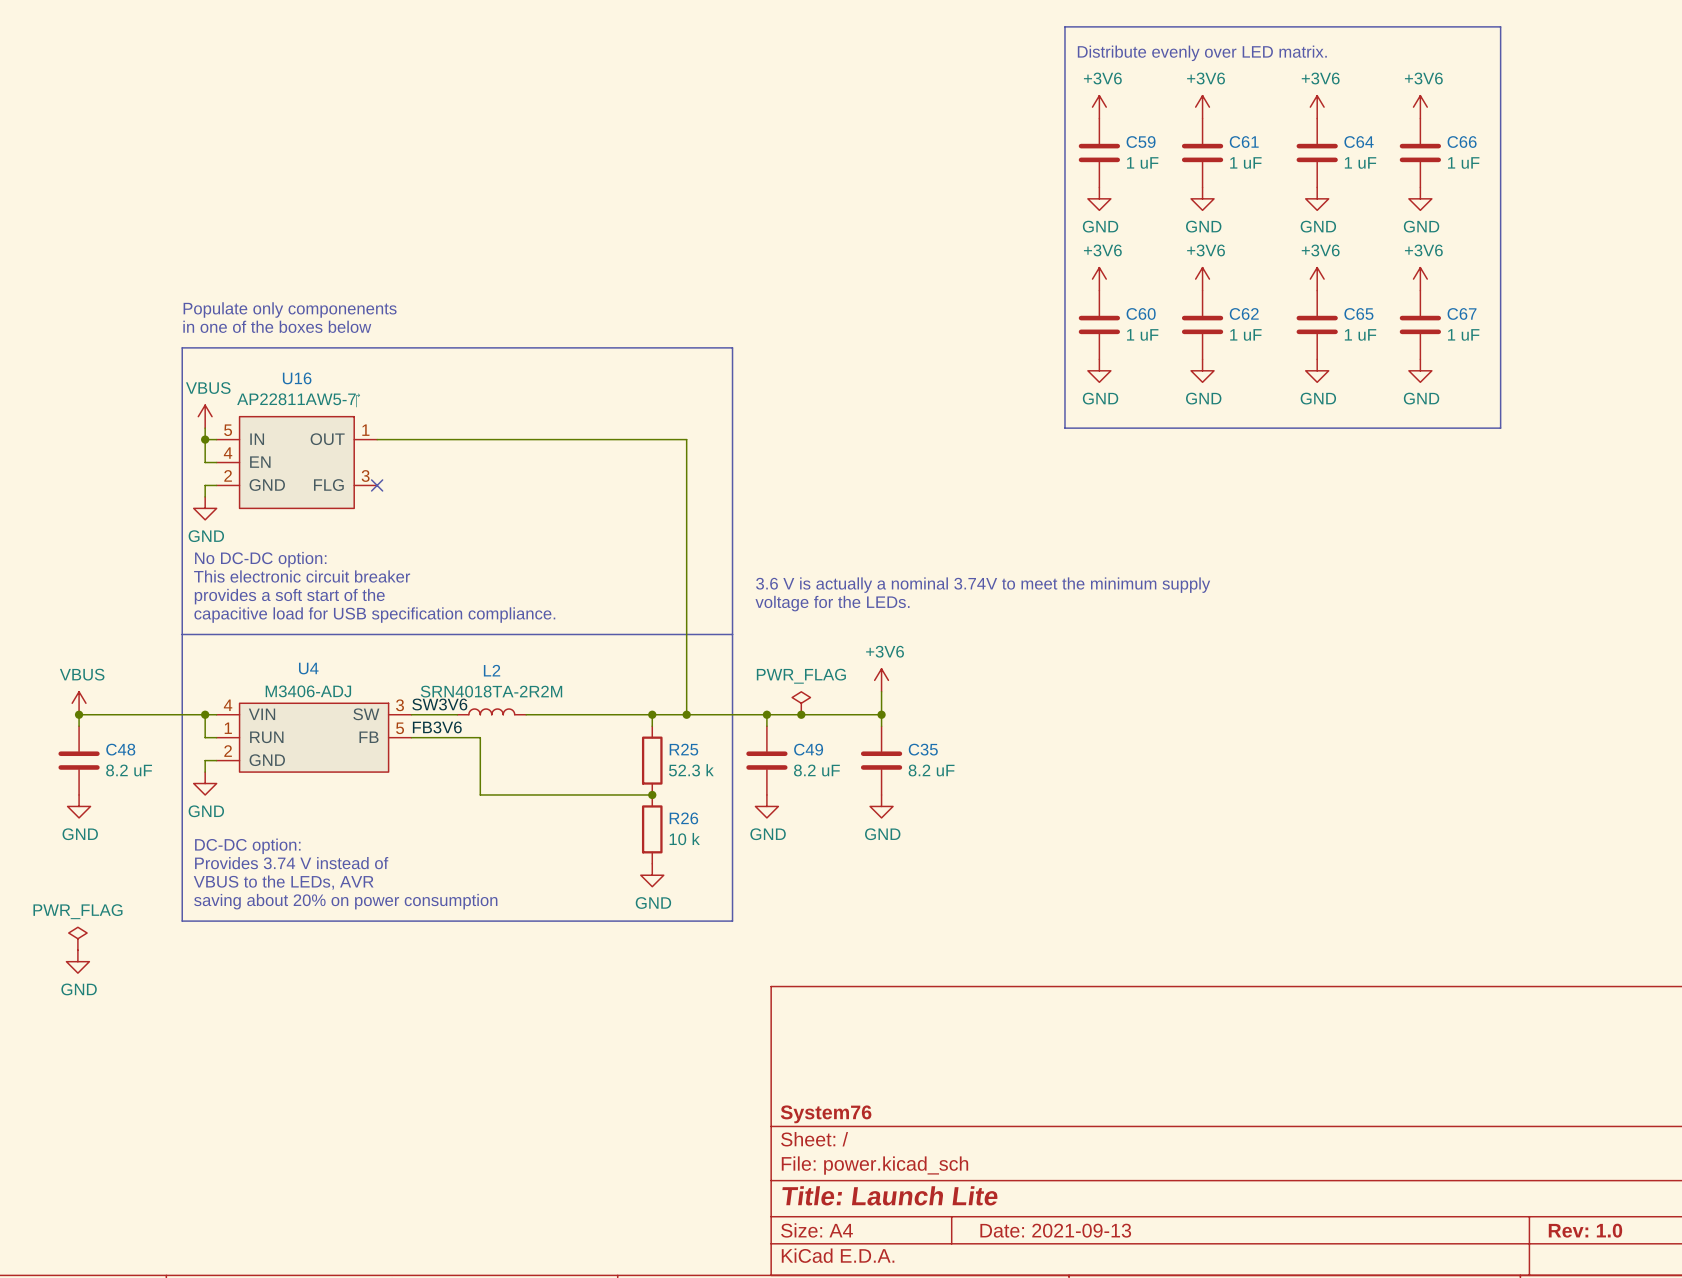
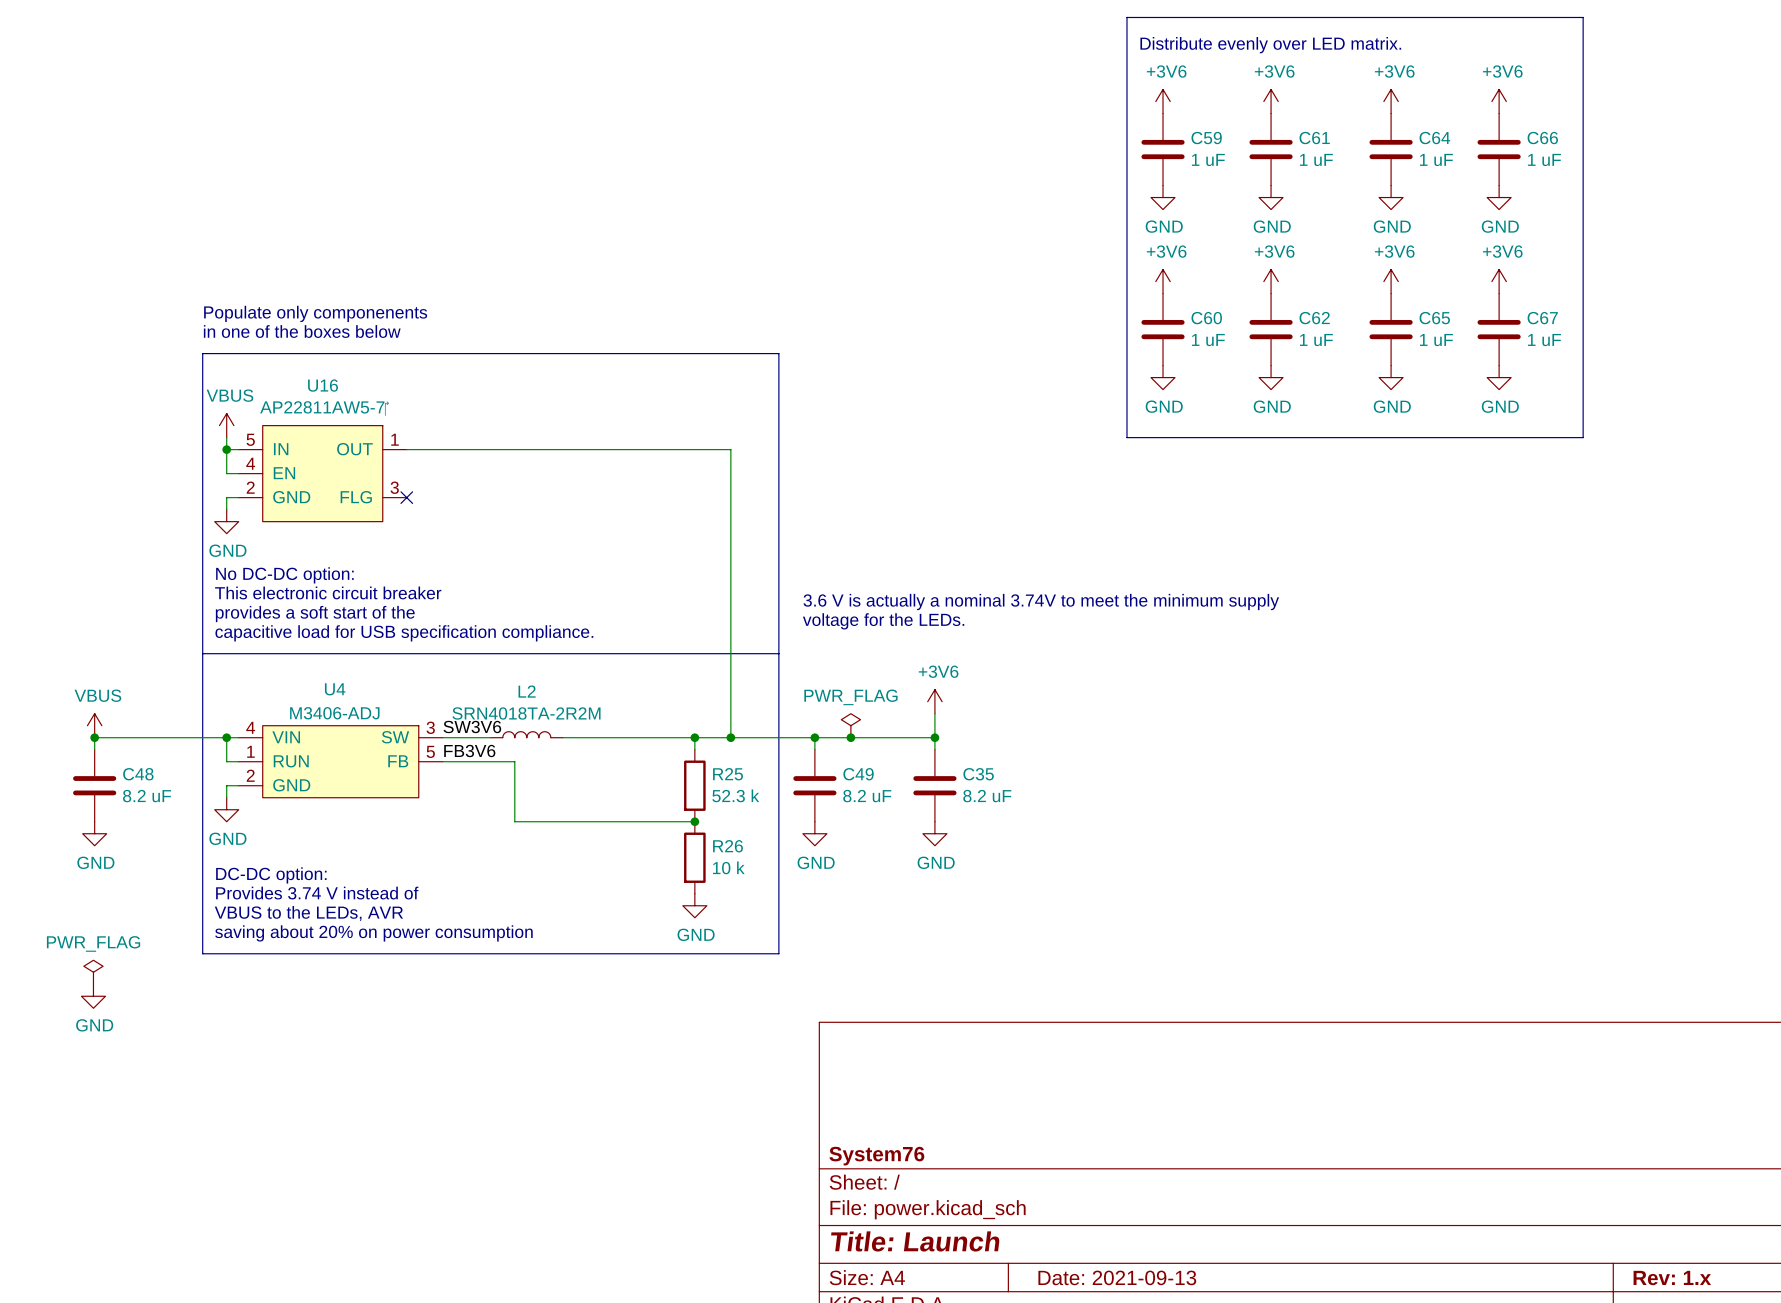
title block: Title: Launch Lite (890, 1195) -> Title: Launch (915, 1241)
title block: Rev: 1.0 (1585, 1230) -> Rev: 1.x (1672, 1278)

